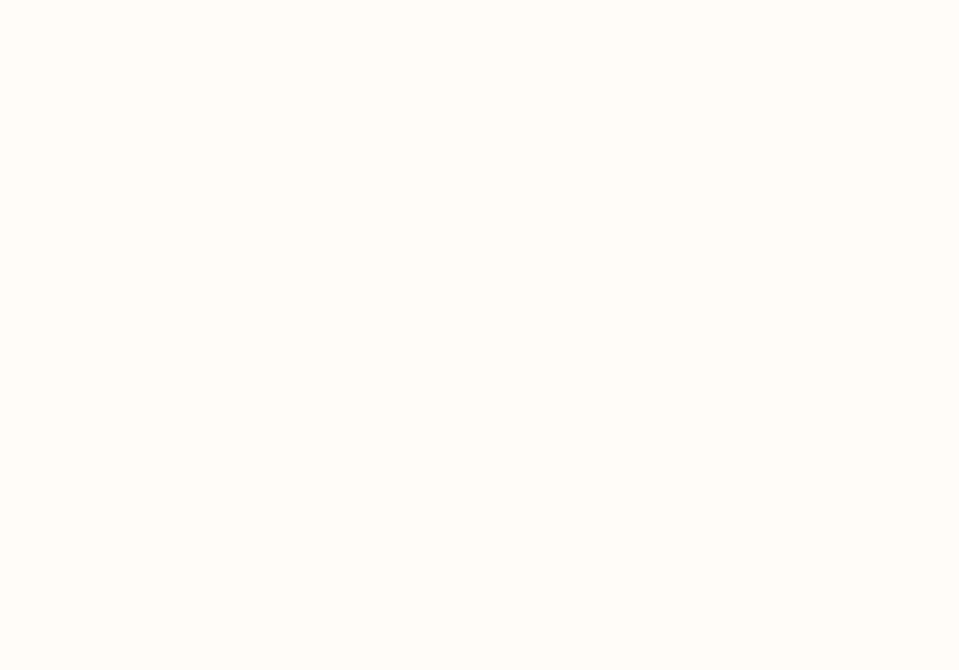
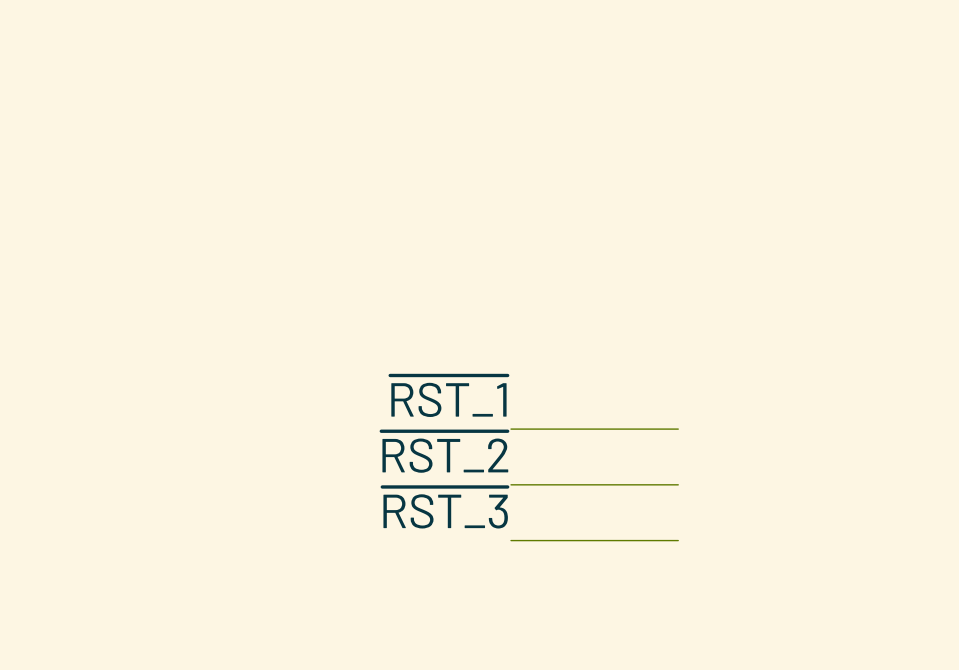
label: none -> ~{RST_1} (448, 396)
wire: none -> (511, 429) (678, 429)
label: none -> ~{RST_2} (444, 452)
wire: none -> (511, 484) (678, 484)
label: none -> ~{RST_3} (445, 507)
wire: none -> (511, 540) (678, 540)

